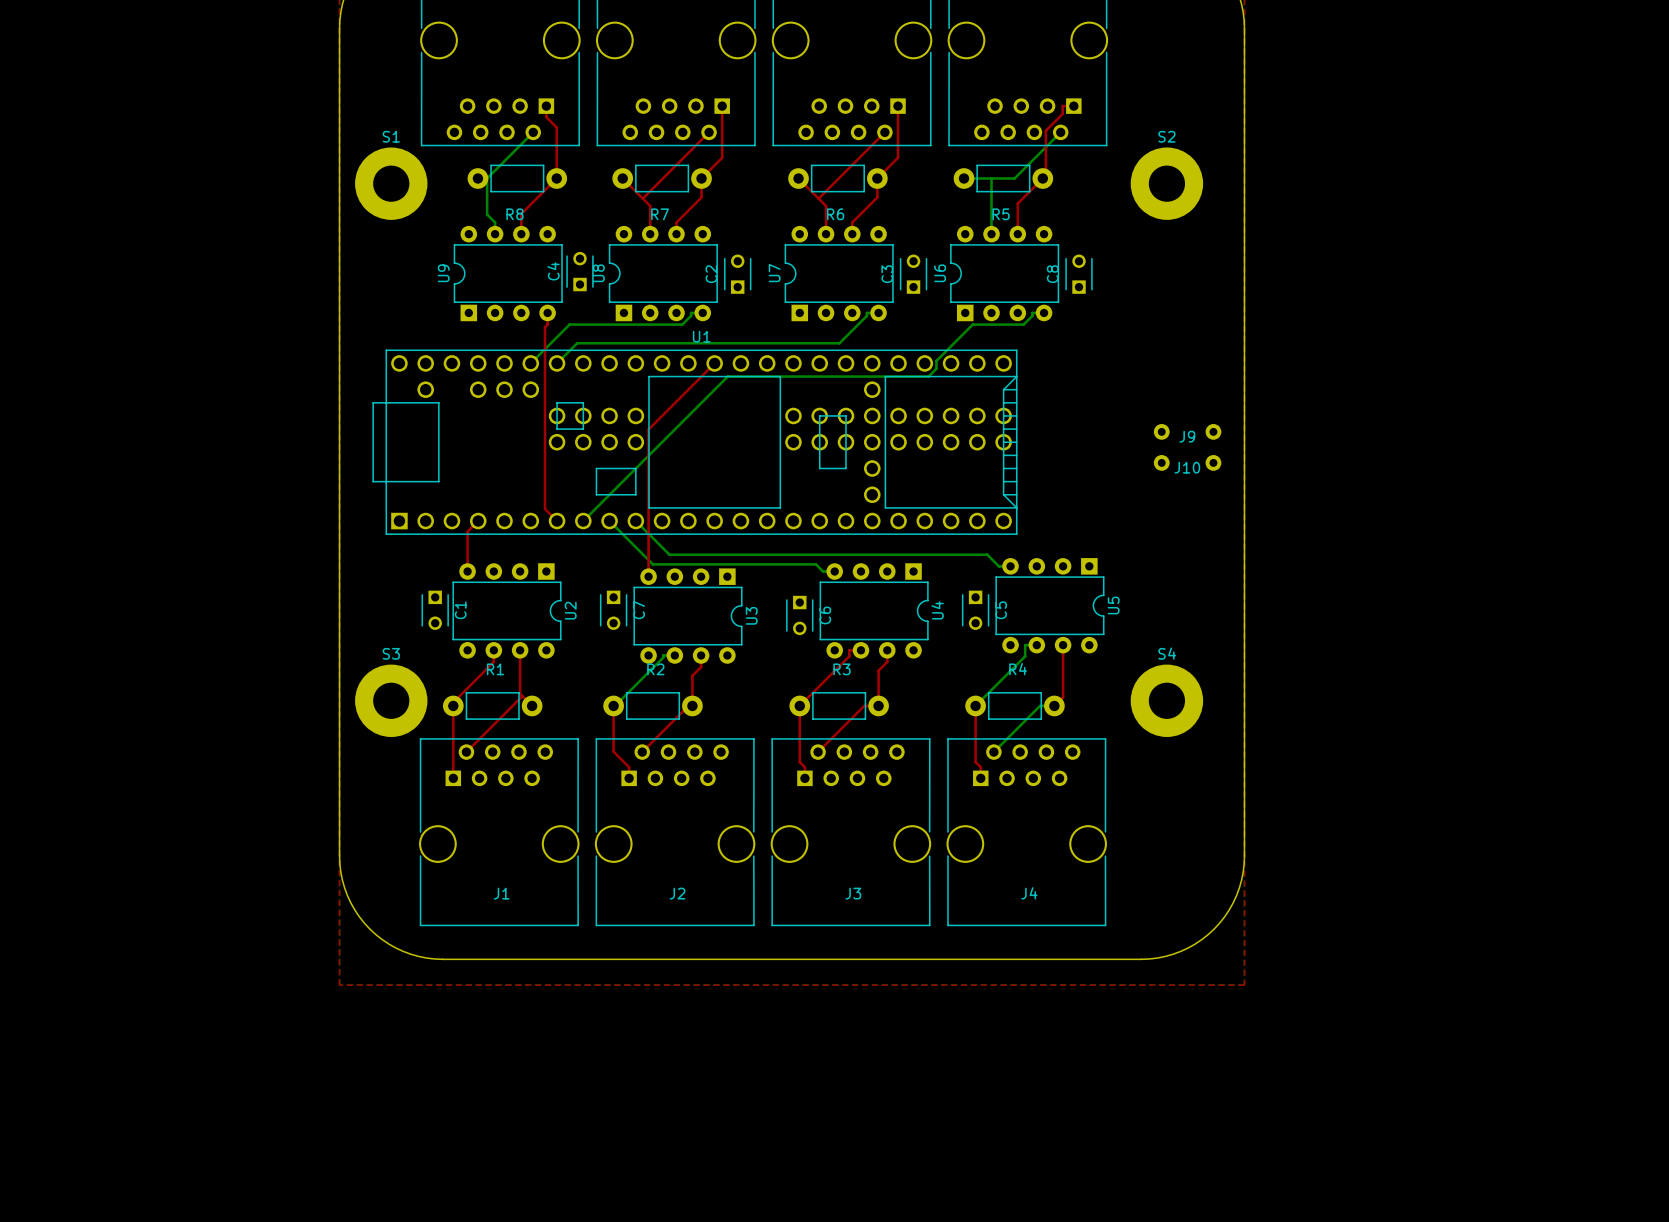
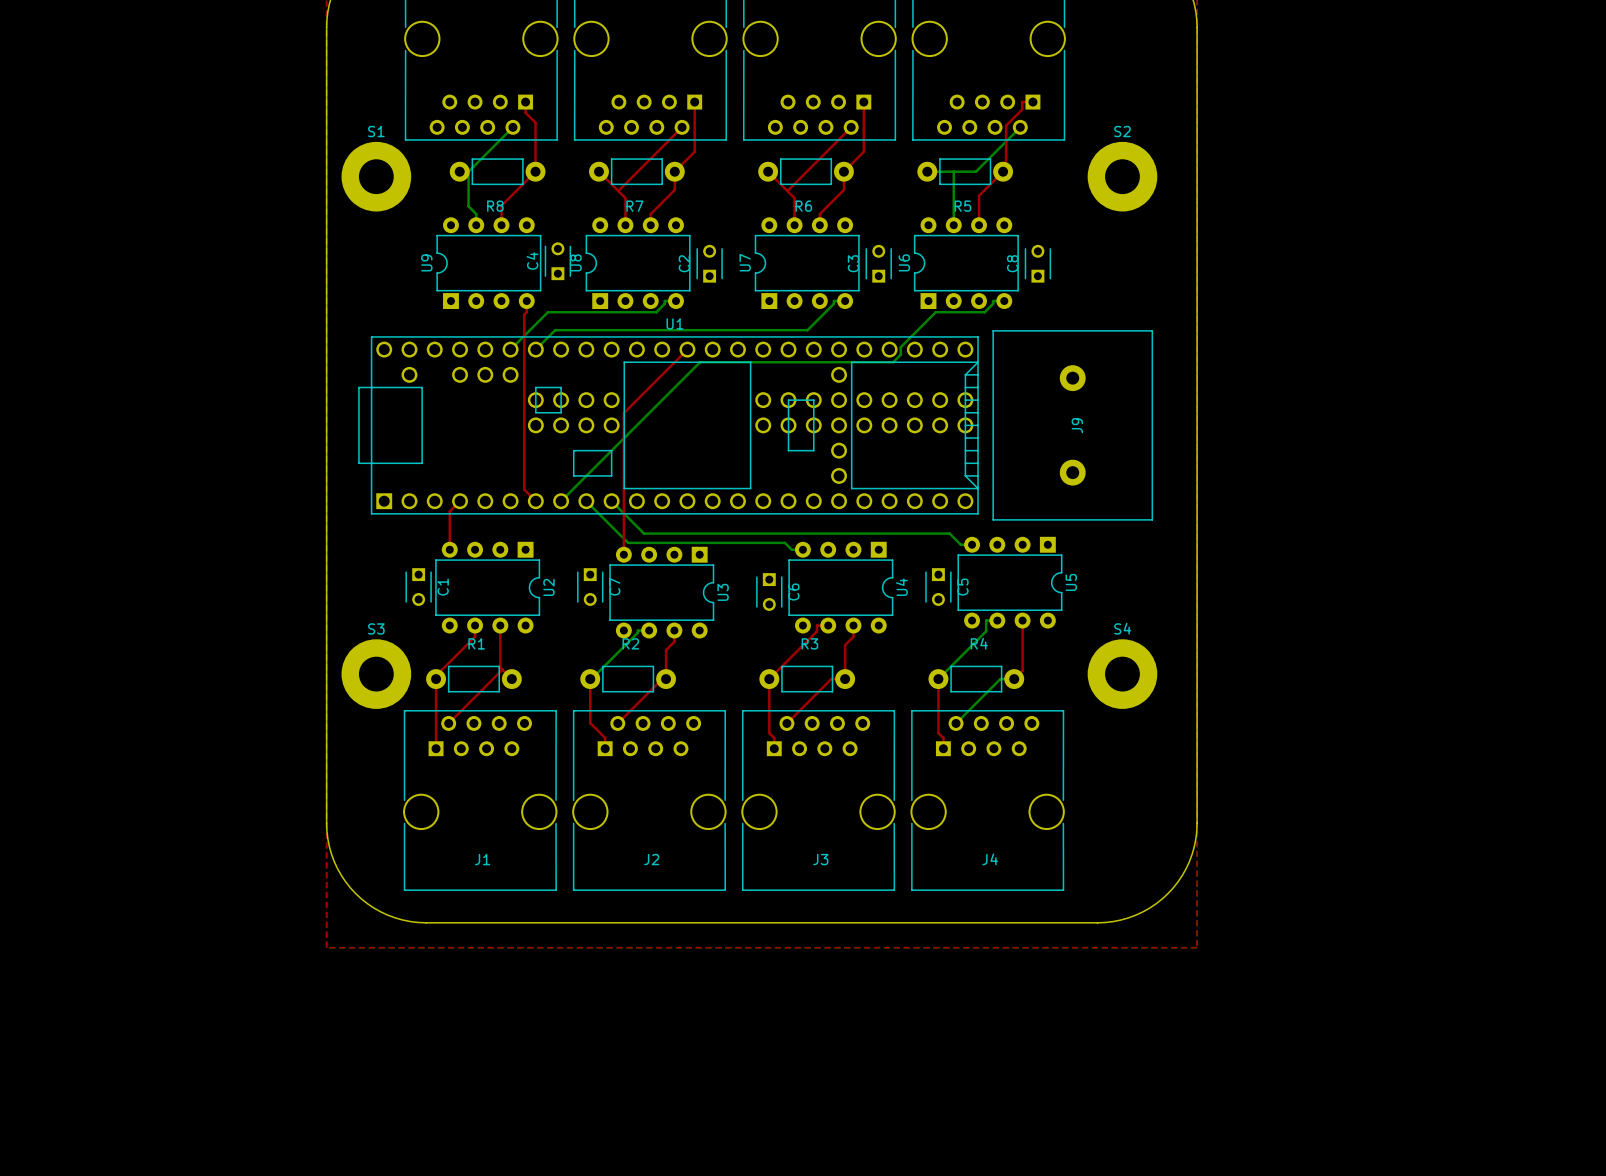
J9 footprint: [1153, 424, 1222, 440] -> [992, 330, 1154, 521]
J10: (1187, 462) -> none

